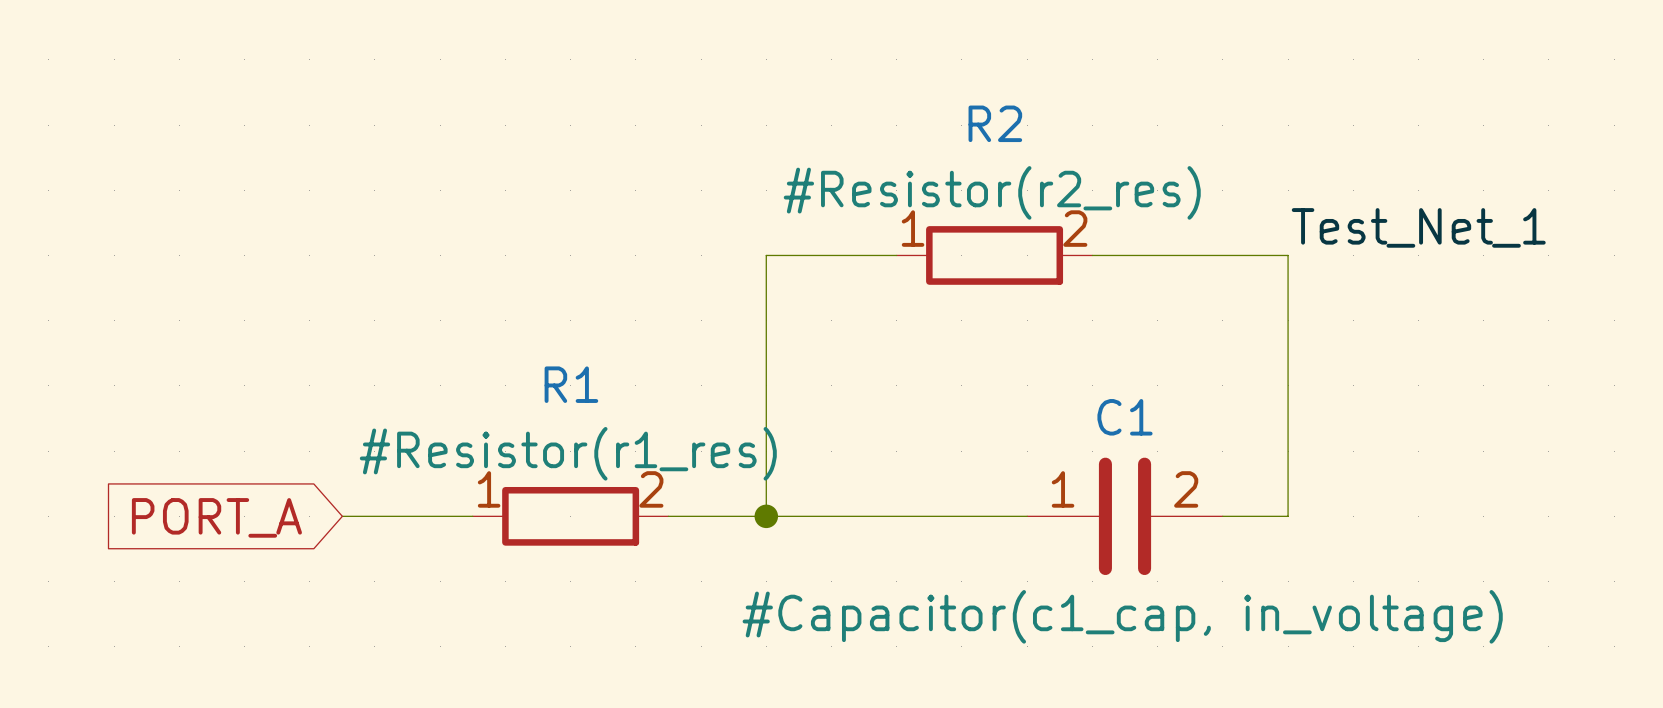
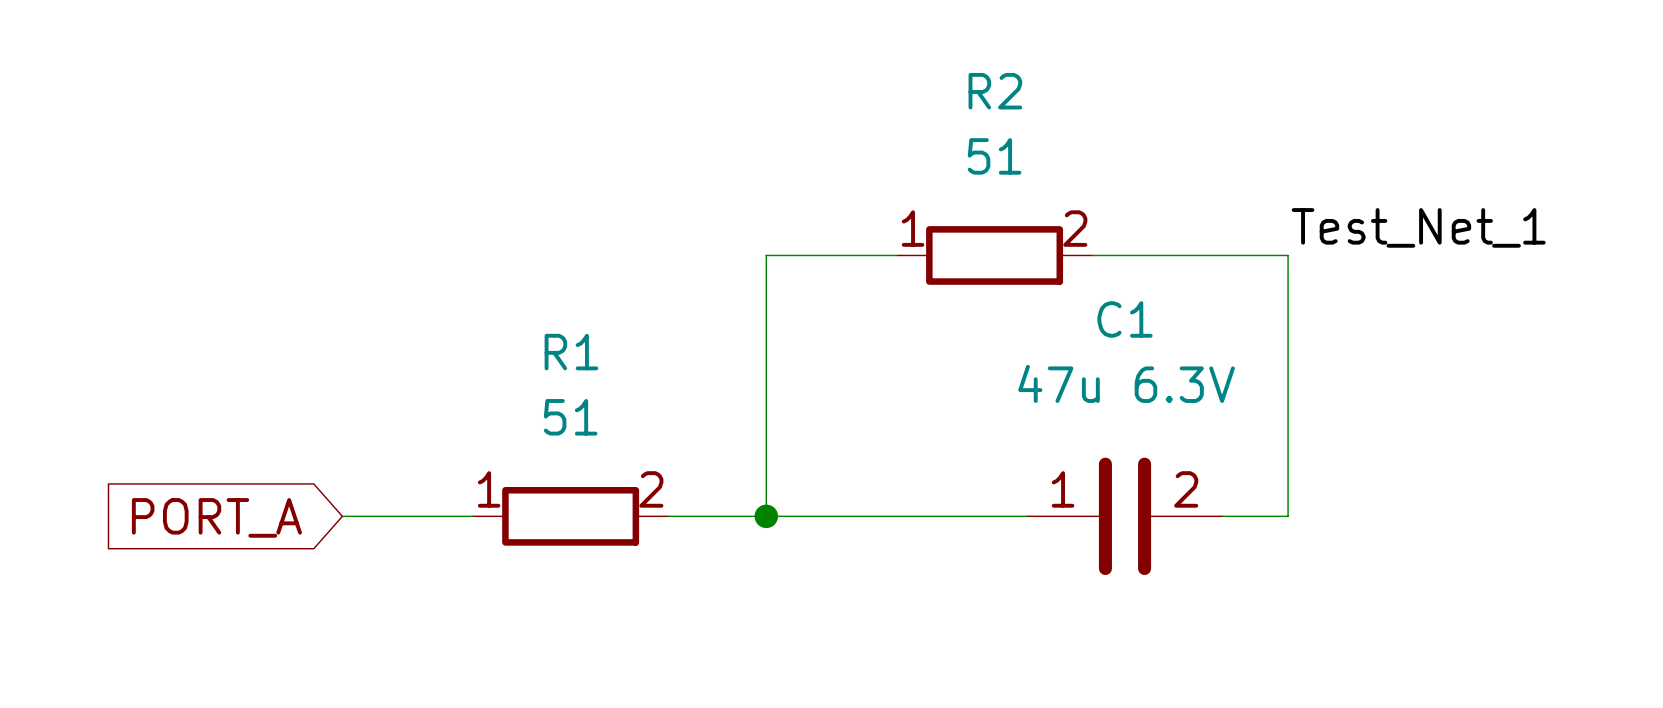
R2 name position: R2 (995, 123) -> R2 (995, 91)
R2 value: #Resistor(r2_res) (992, 192) -> 51 (994, 156)
R1 name position: R1 (571, 384) -> R1 (571, 352)
C1 name position: C1 (1125, 417) -> C1 (1125, 319)
R1 value: #Resistor(r1_res) (568, 453) -> 51 (570, 417)
C1 value: #Capacitor(c1_cap, in_voltage) (1122, 616) -> 47u 6.3V (1126, 383)

